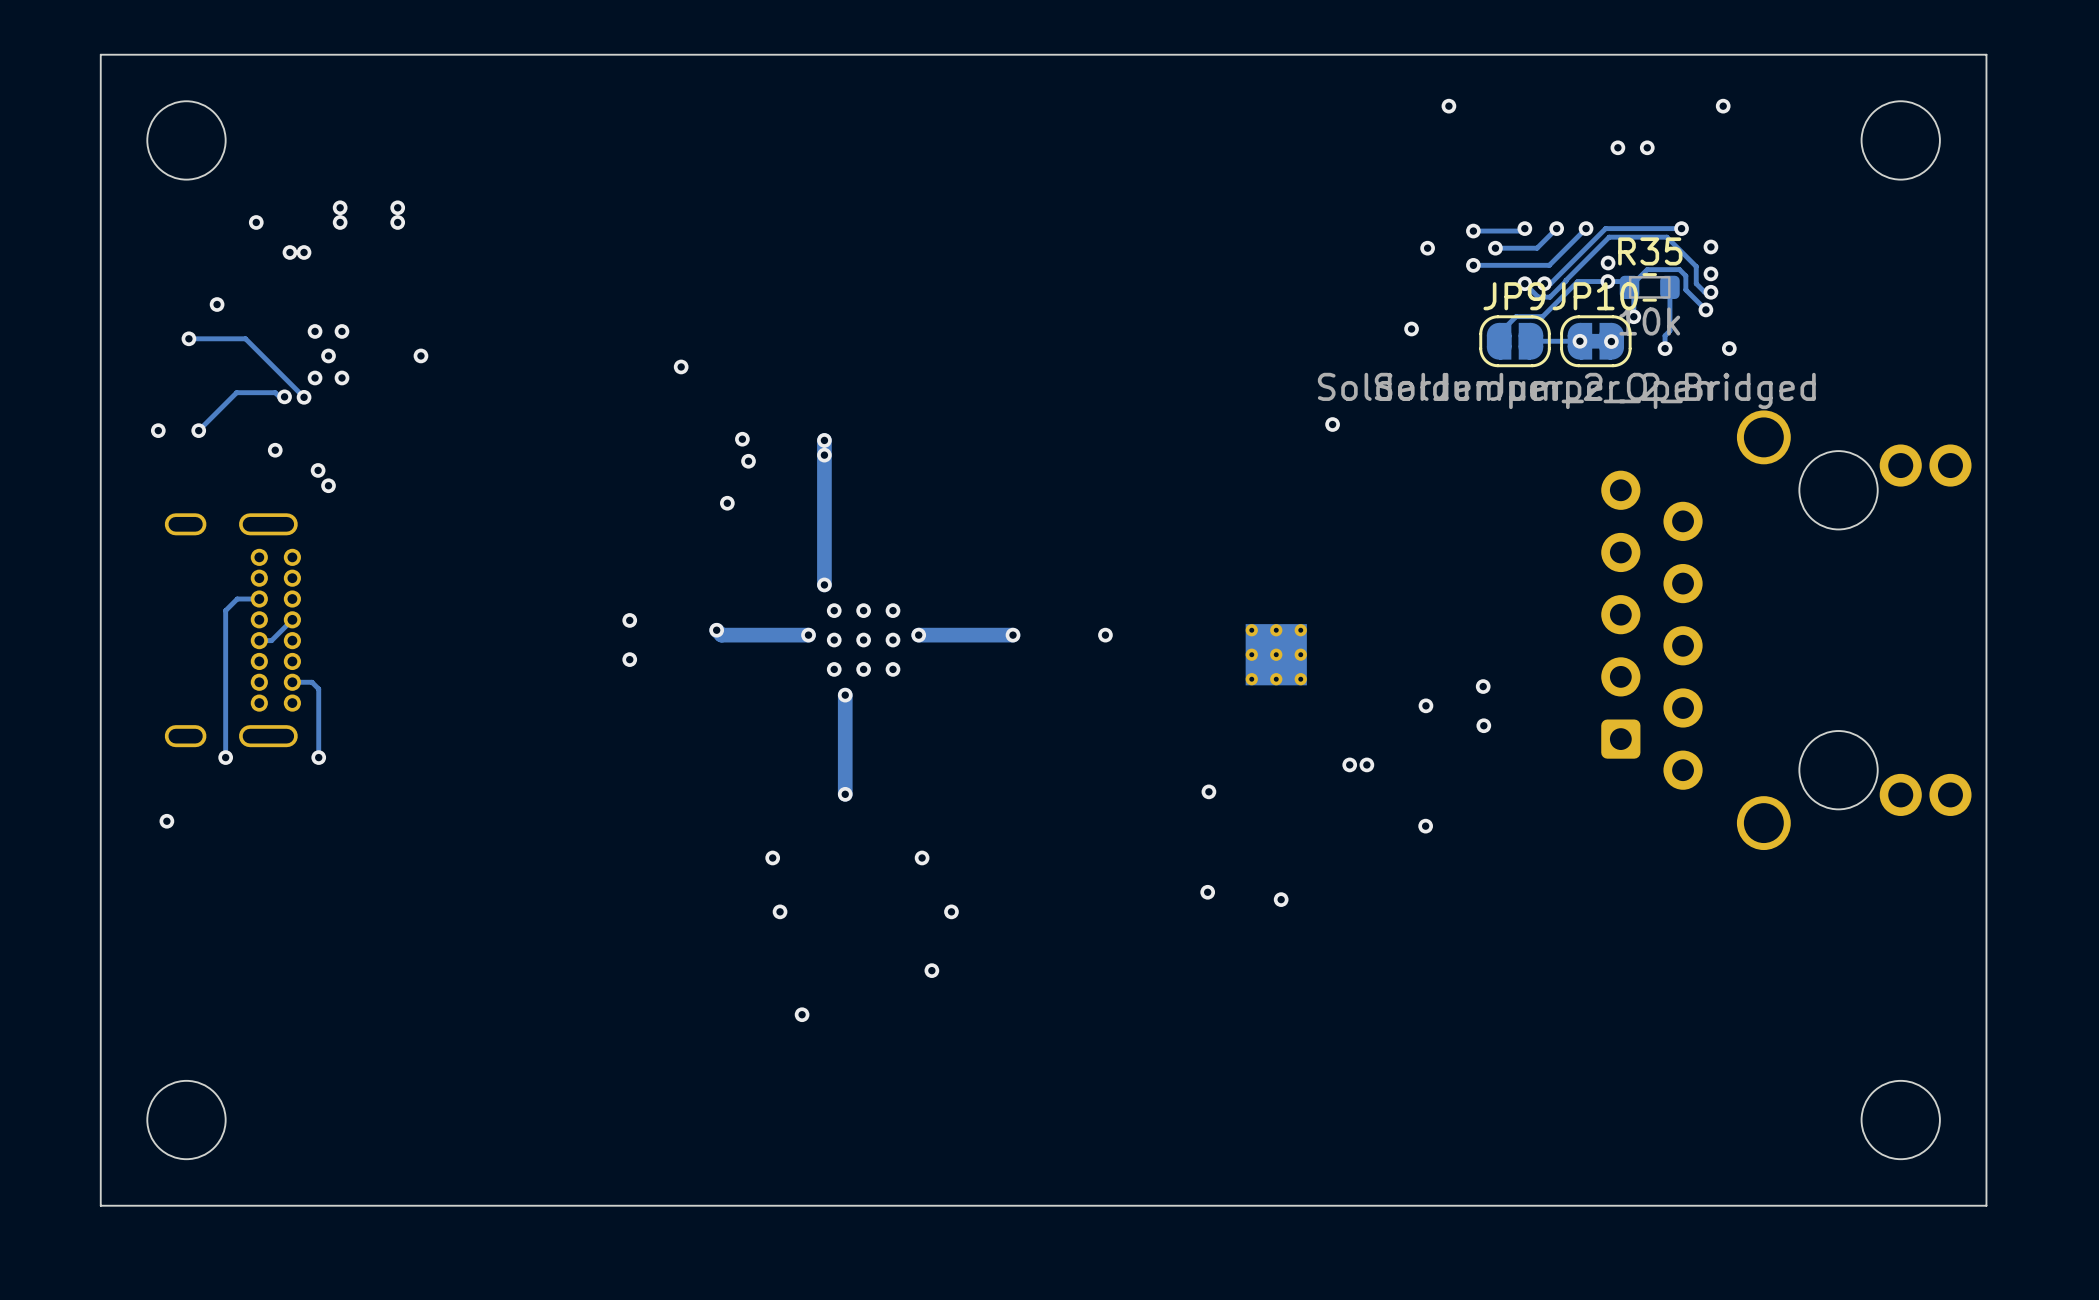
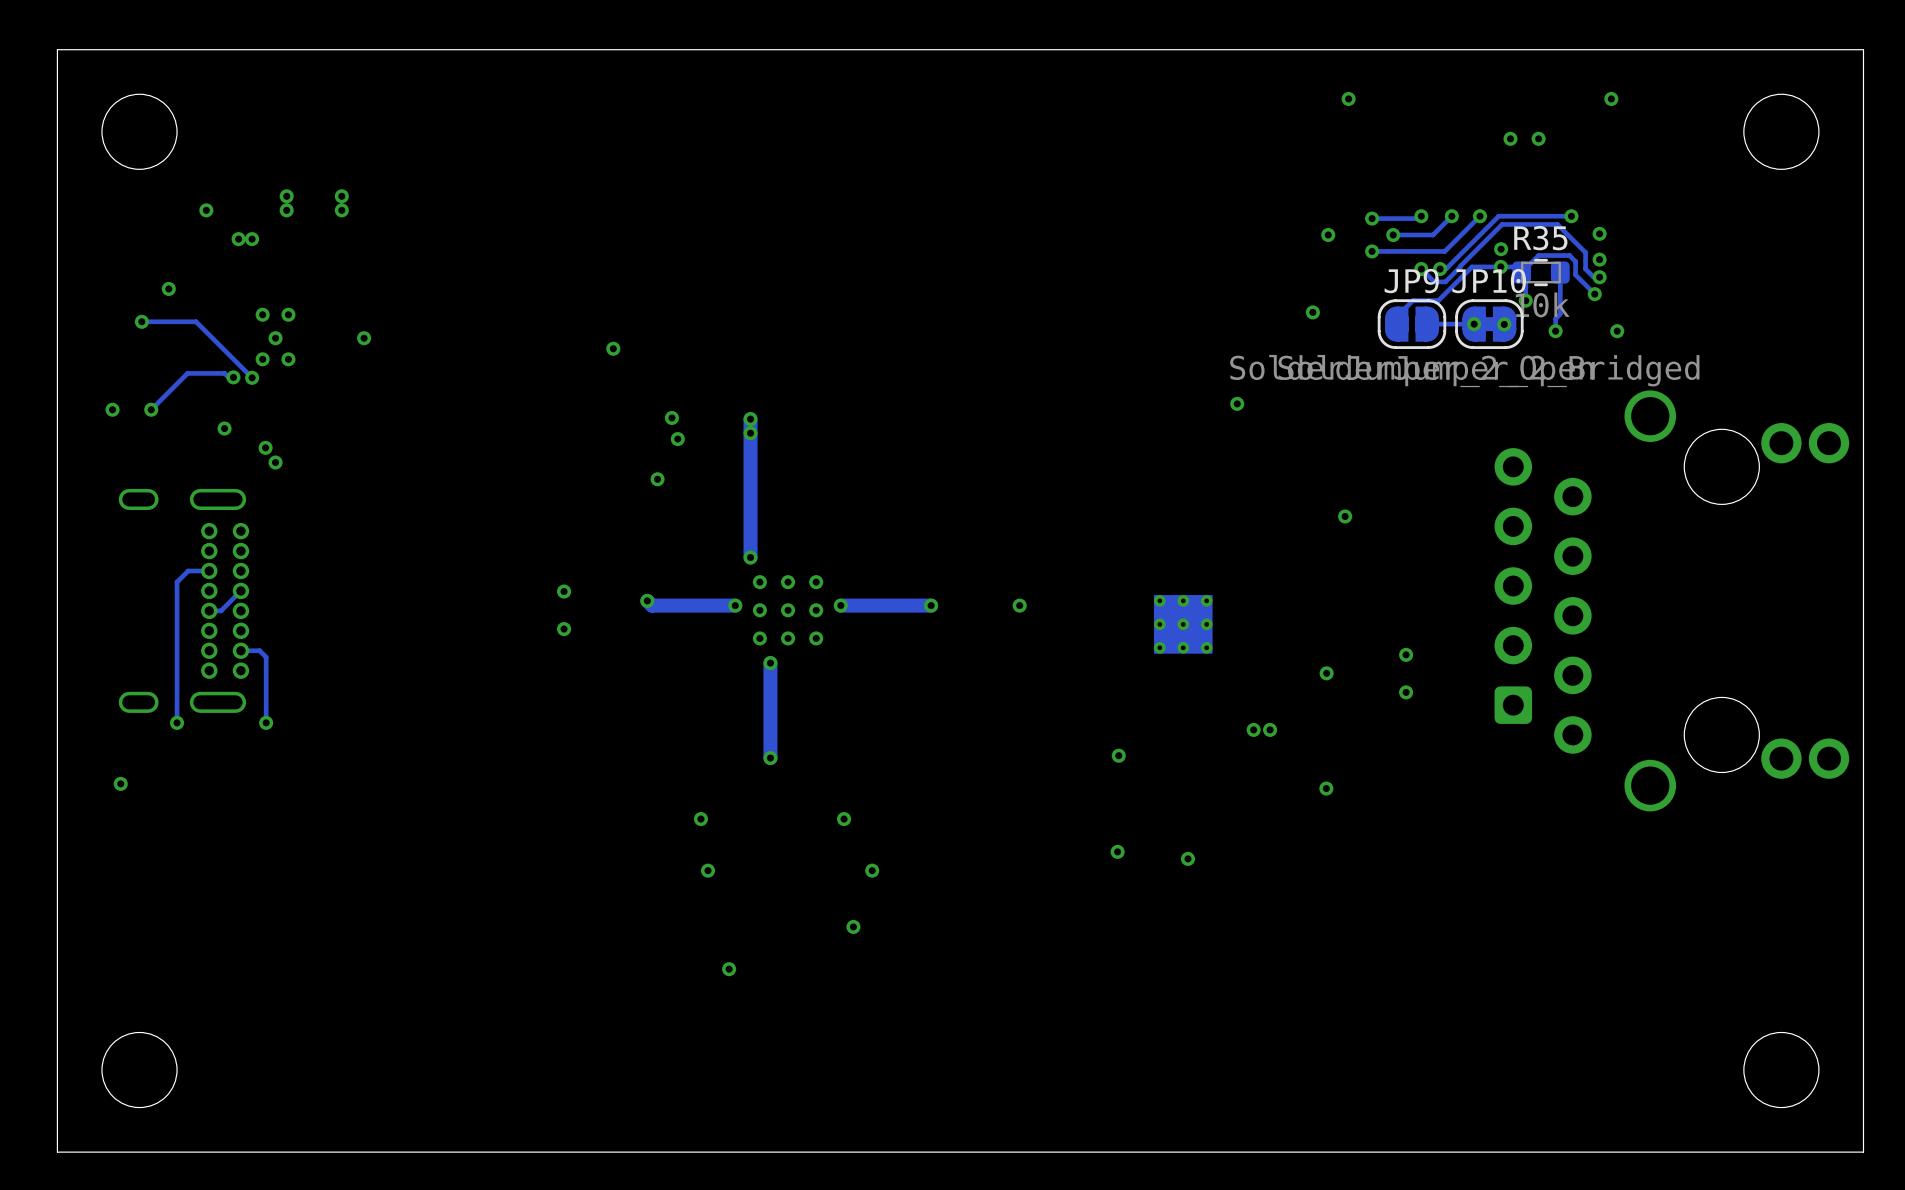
via: none -> (1345, 516)
via: (1483, 686) -> none
via: none -> (1406, 654)
via: (1483, 725) -> none
via: none -> (1406, 692)

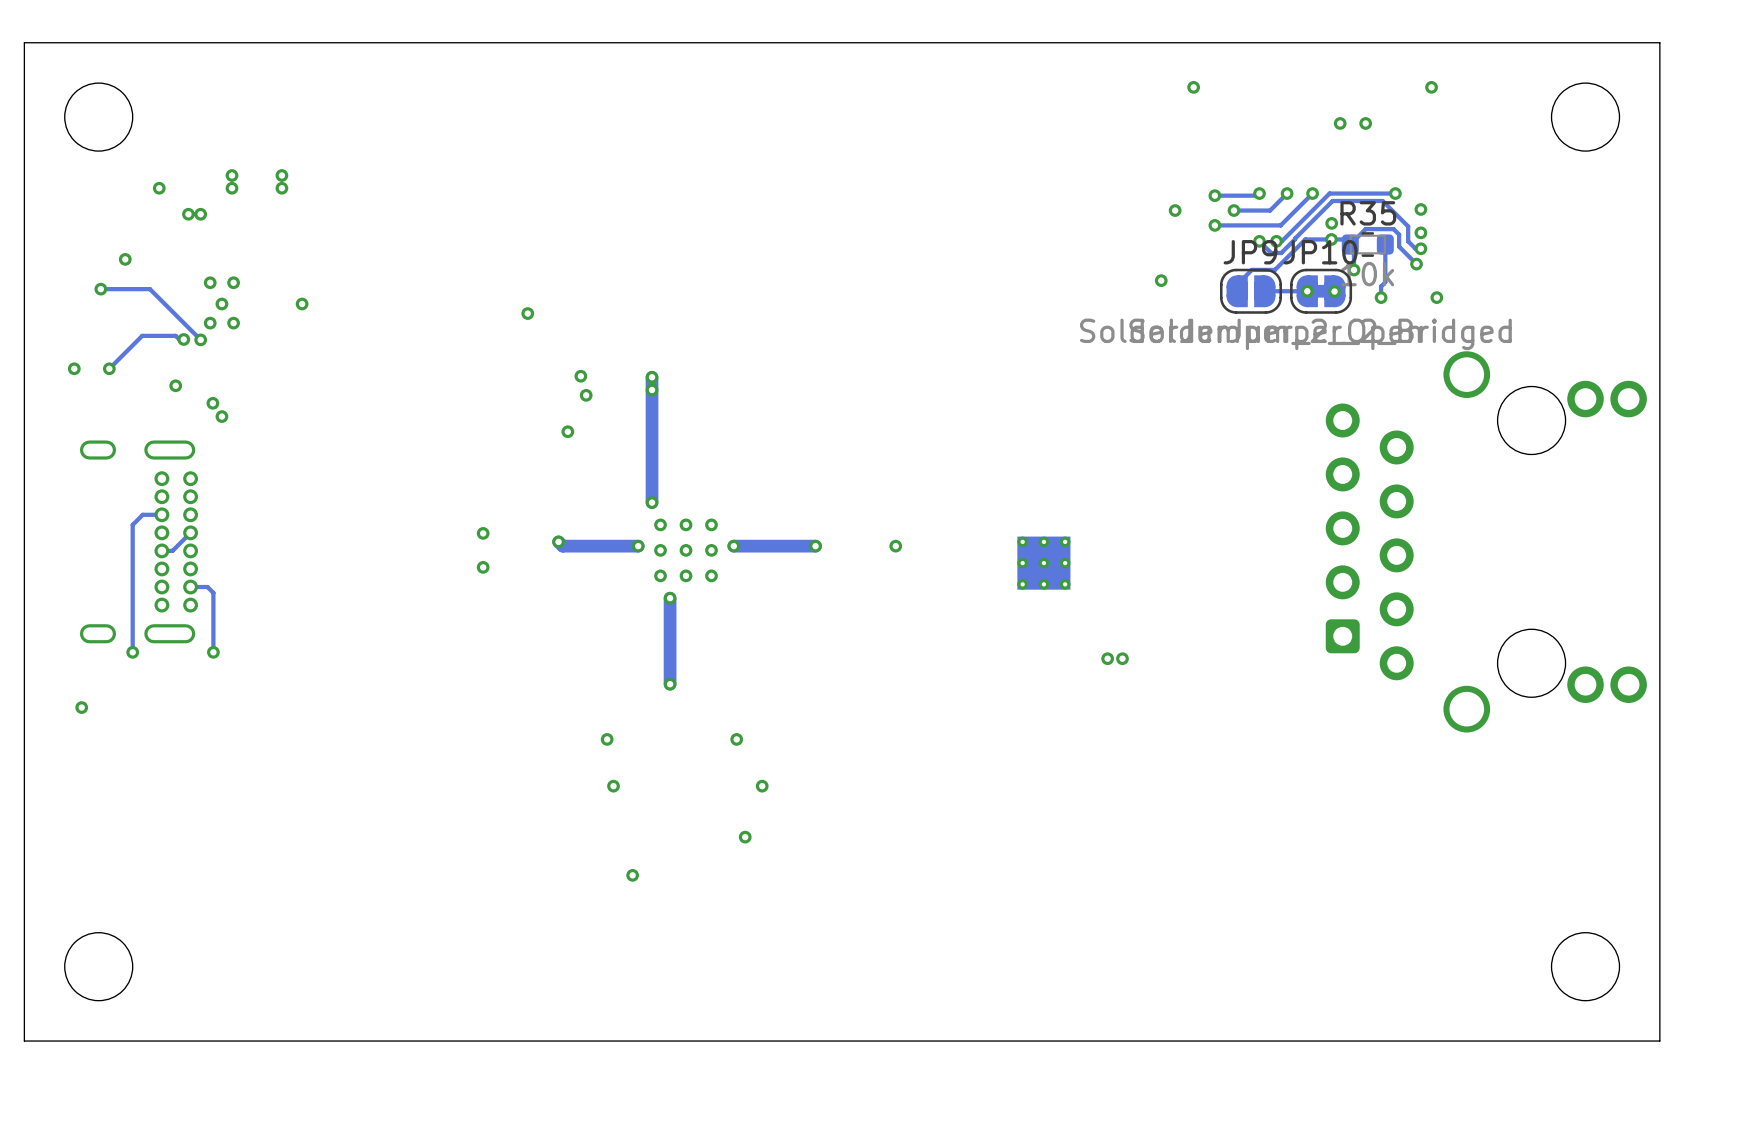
via: (1237, 403) -> none
via: (1345, 516) -> none
via: (1406, 654) -> none
via: (1326, 673) -> none
via: (1406, 692) -> none
via: (1118, 755) -> none
via: (1326, 788) -> none
via: (1117, 851) -> none
via: (1187, 858) -> none

